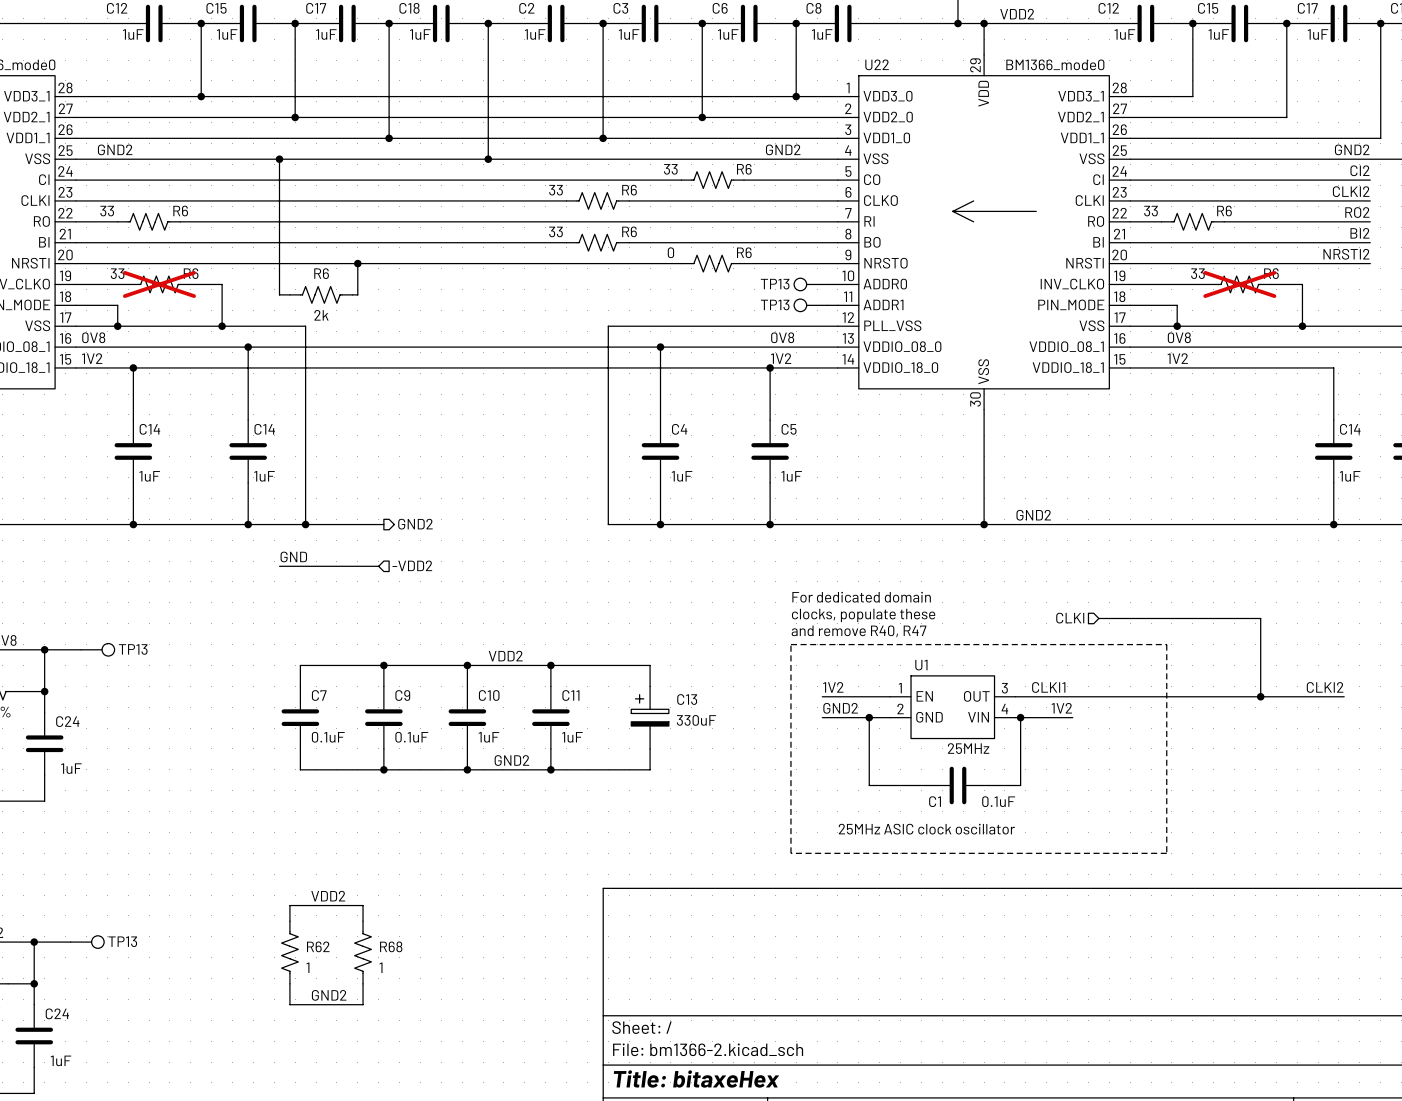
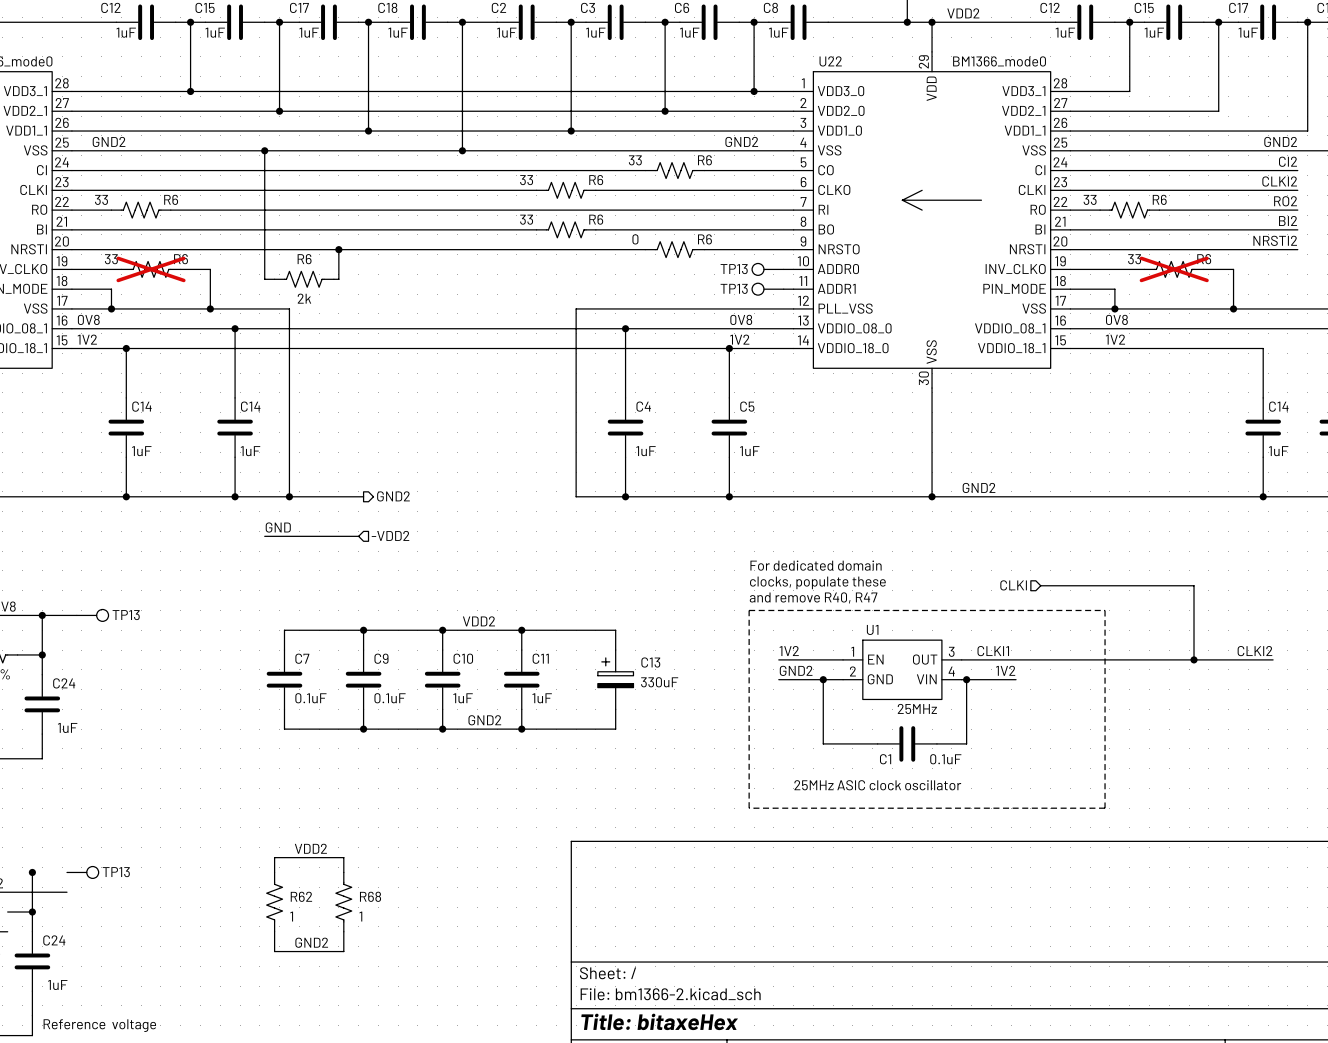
wire: none -> (32, 872) (32, 892)
junction: none -> (32, 872)
junction: (34, 942) -> none
TP13 position: (87, 942) -> (82, 872)
wire: none -> (7, 912) (32, 912)
junction: none -> (32, 912)
wire: (8, 983) (34, 983) (34, 1004) -> none
junction: (34, 983) -> none
C24 position: (34, 1036) -> (32, 961)
text: none -> Reference voltage (99, 1025)

